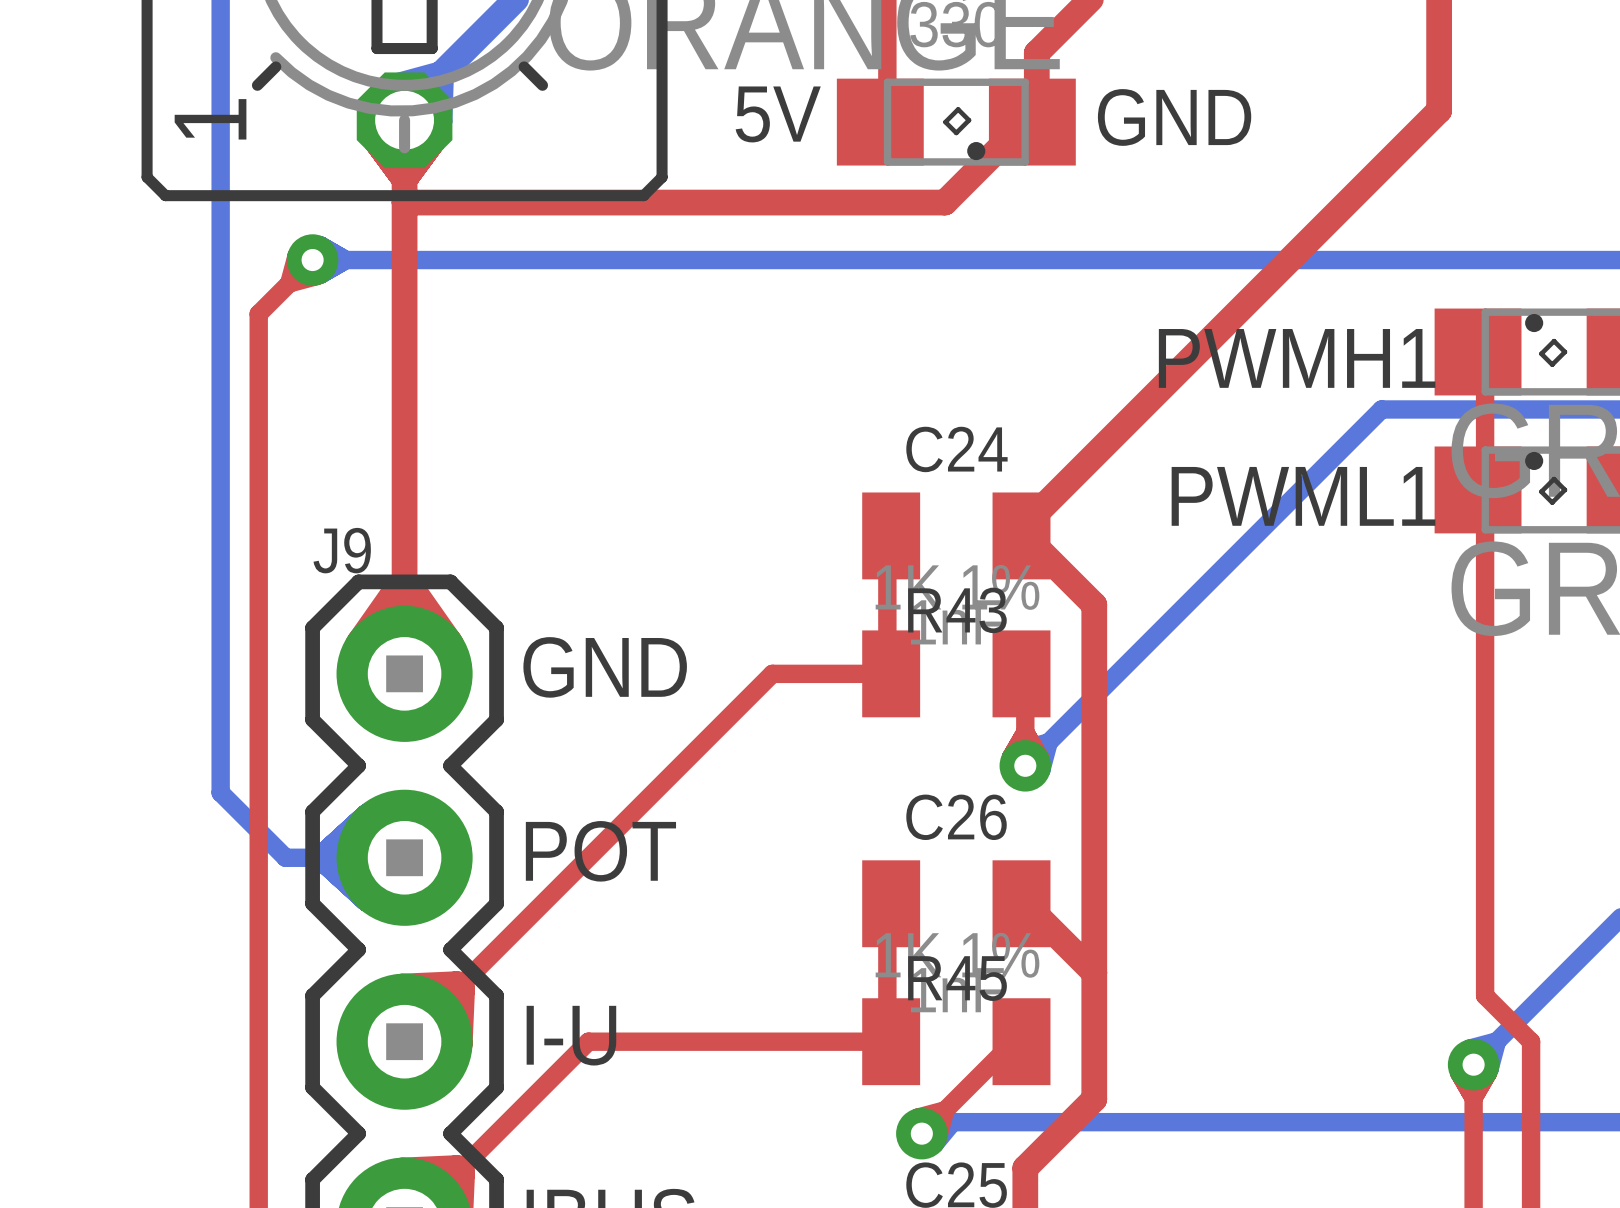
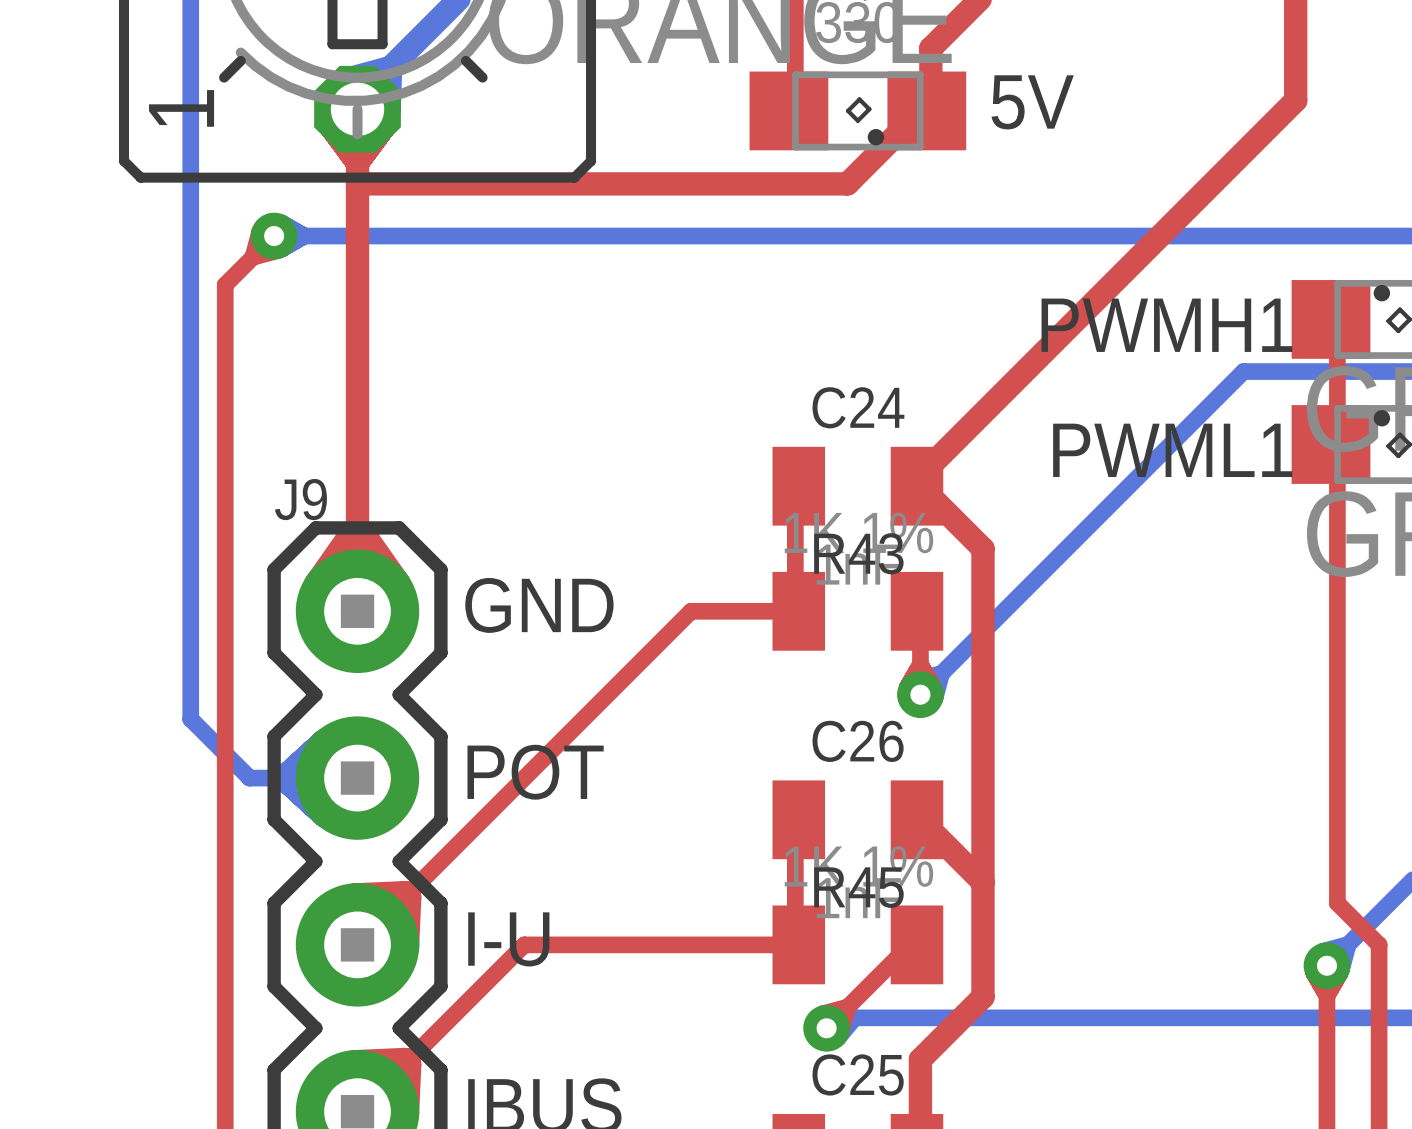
5V name position: 5V (778, 114) -> 5V (1032, 102)
text: GND (1174, 117) -> none

